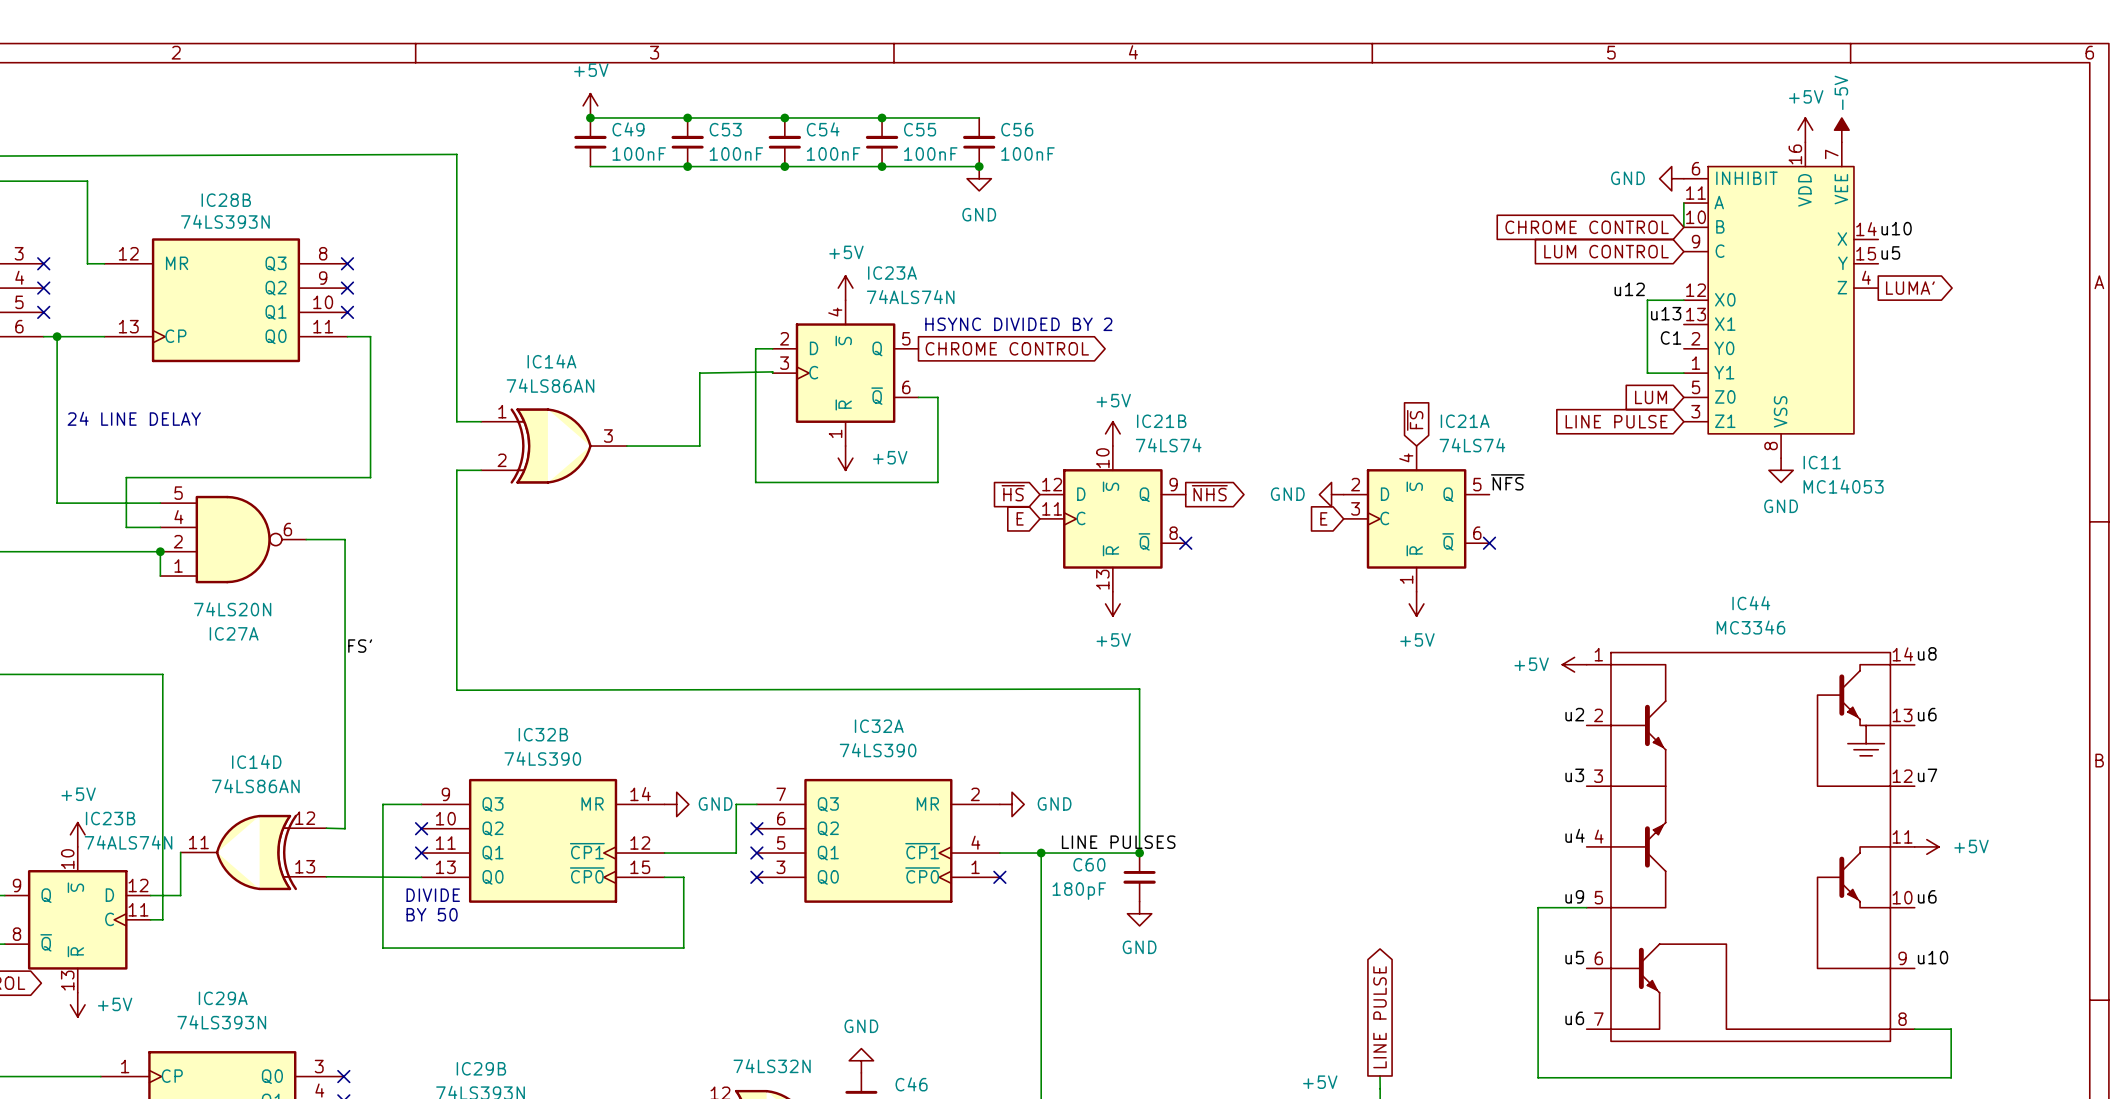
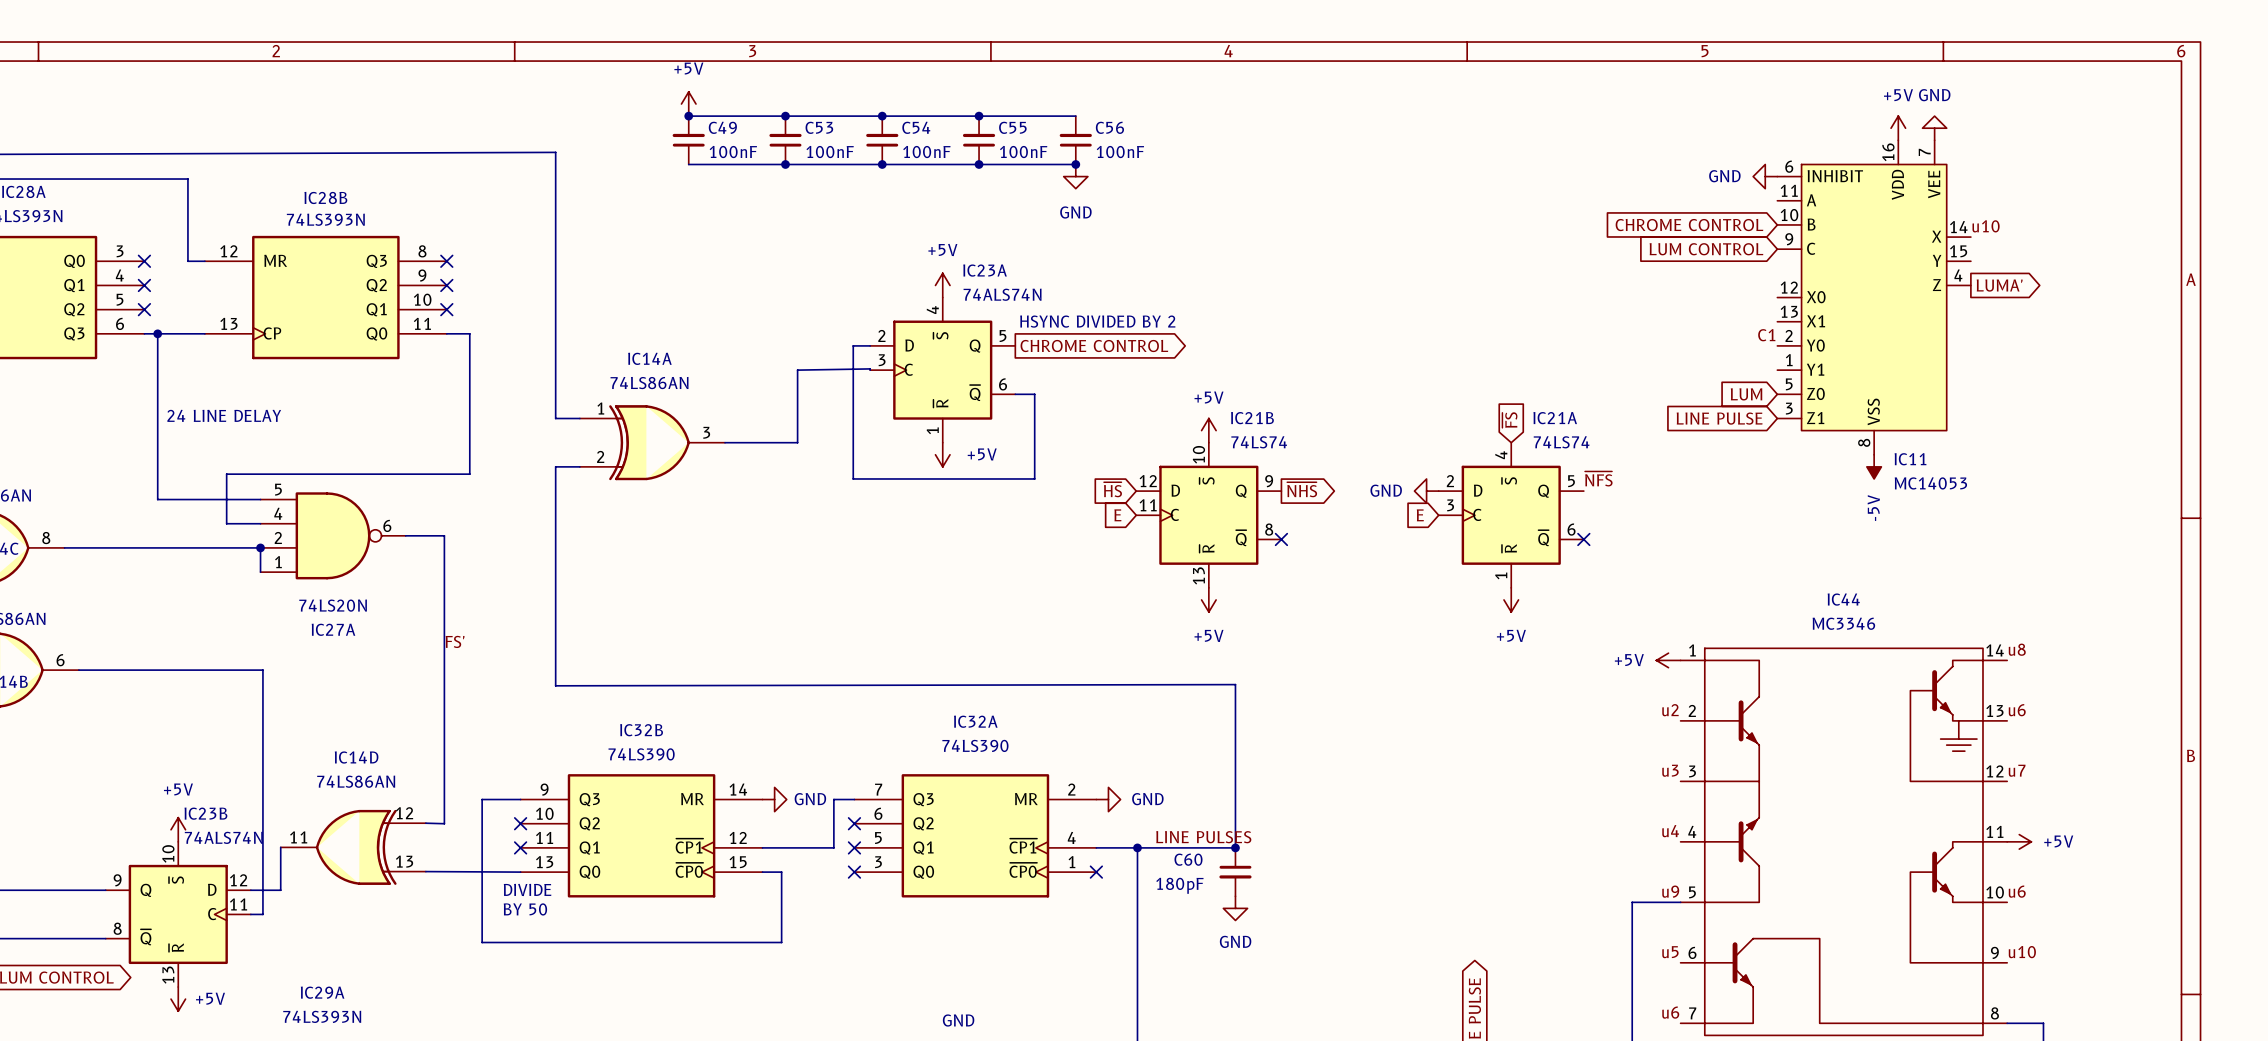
power symbol: -5V (1841, 130) -> GND (1934, 128)
wire: (1683, 203) (1683, 227) -> none
label: u5 (1890, 252) -> none
label: u12 (1629, 289) -> none
wire: (1683, 300) (1647, 300) (1647, 373) (1683, 373) -> none
label: u13 (1666, 313) -> none
power symbol: GND (1781, 470) -> -5V (1874, 466)

